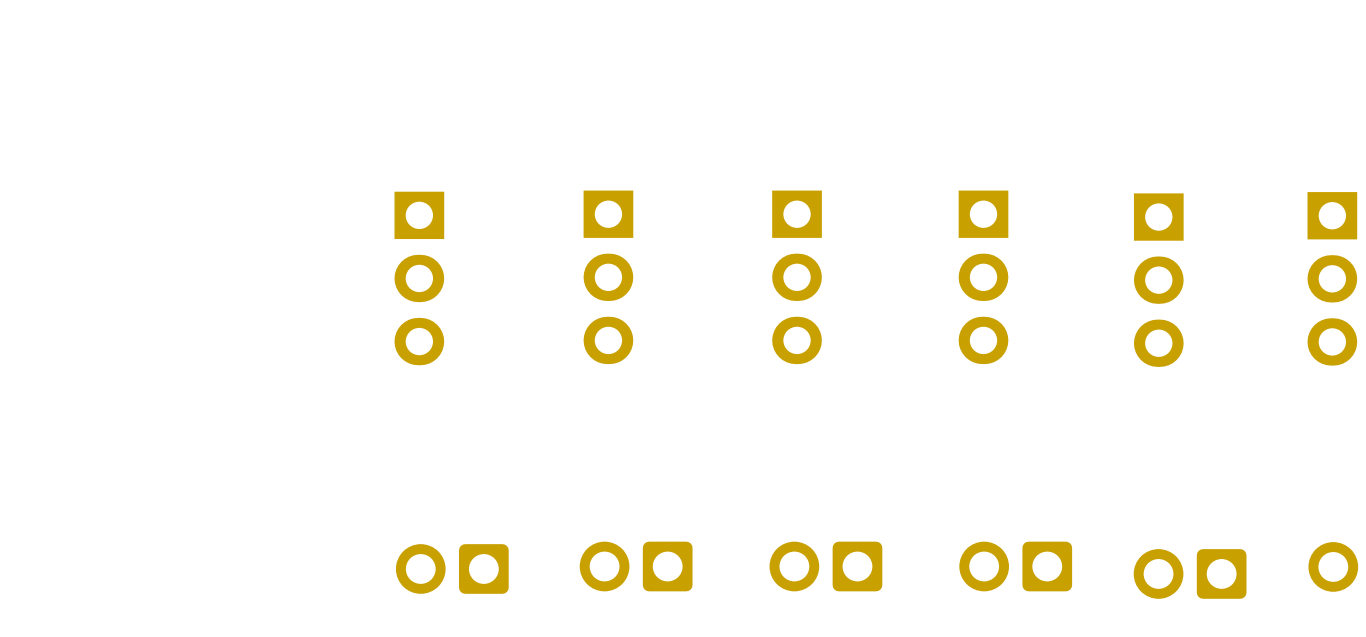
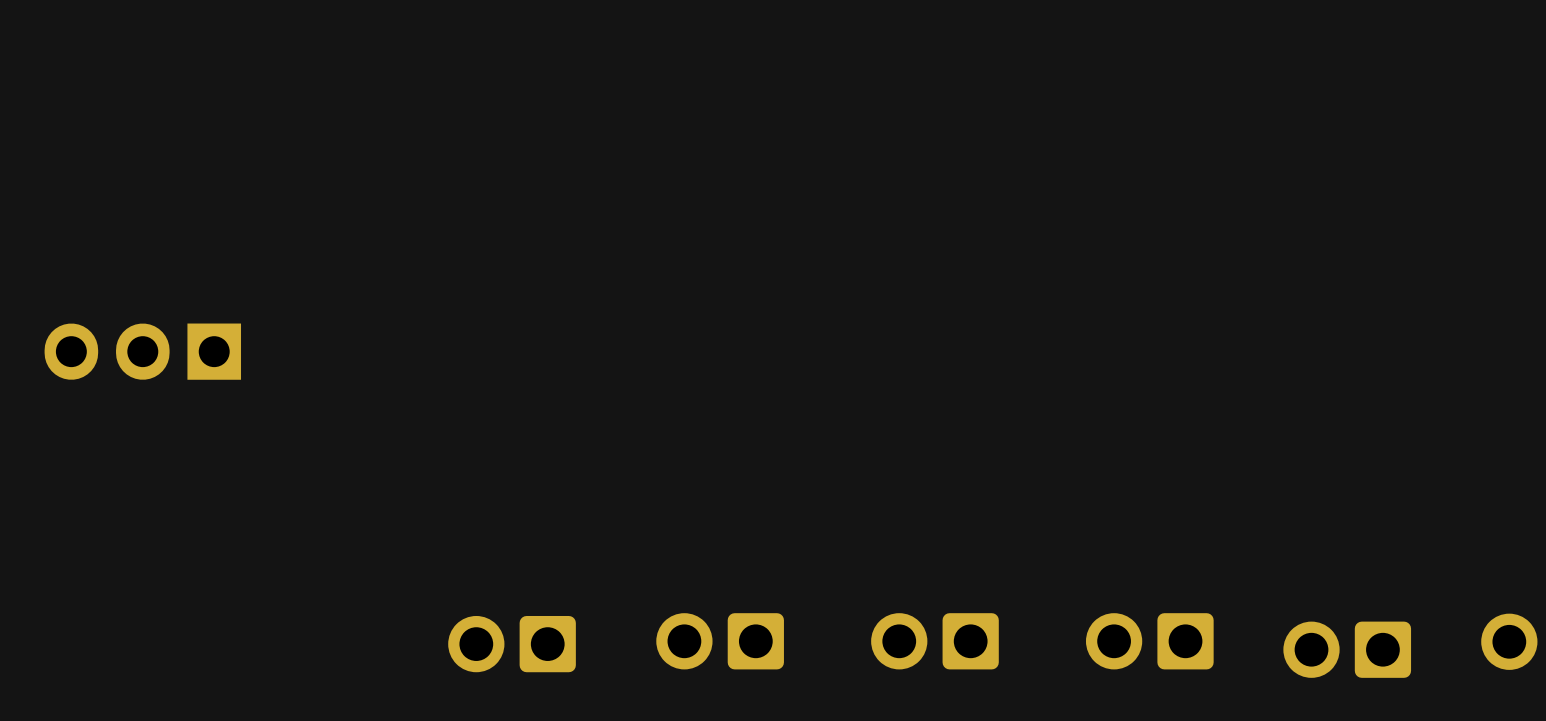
part: (608, 277) -> none
part: (797, 277) -> none
part: (983, 277) -> none
part: (419, 278) -> none
part: (1332, 278) -> none
part: (1158, 280) -> none
part: none -> (142, 351)

